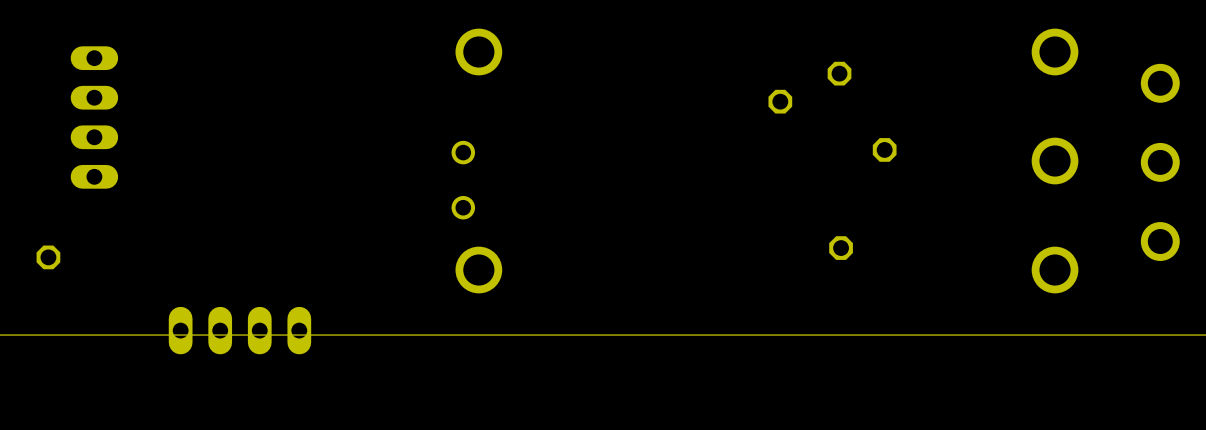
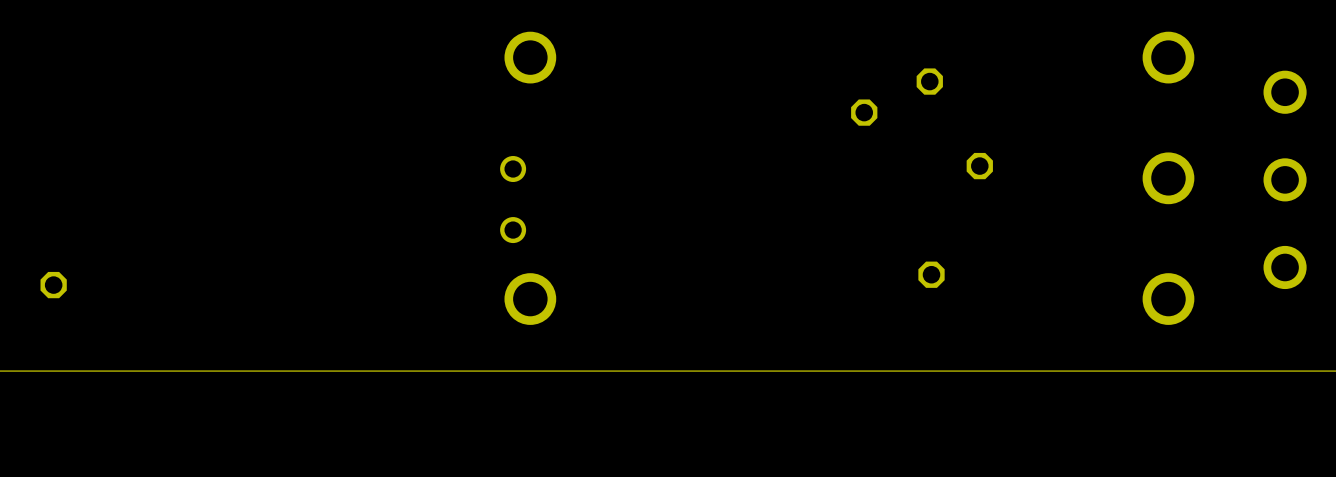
part: (94, 117) -> none
part: (239, 330) -> none

